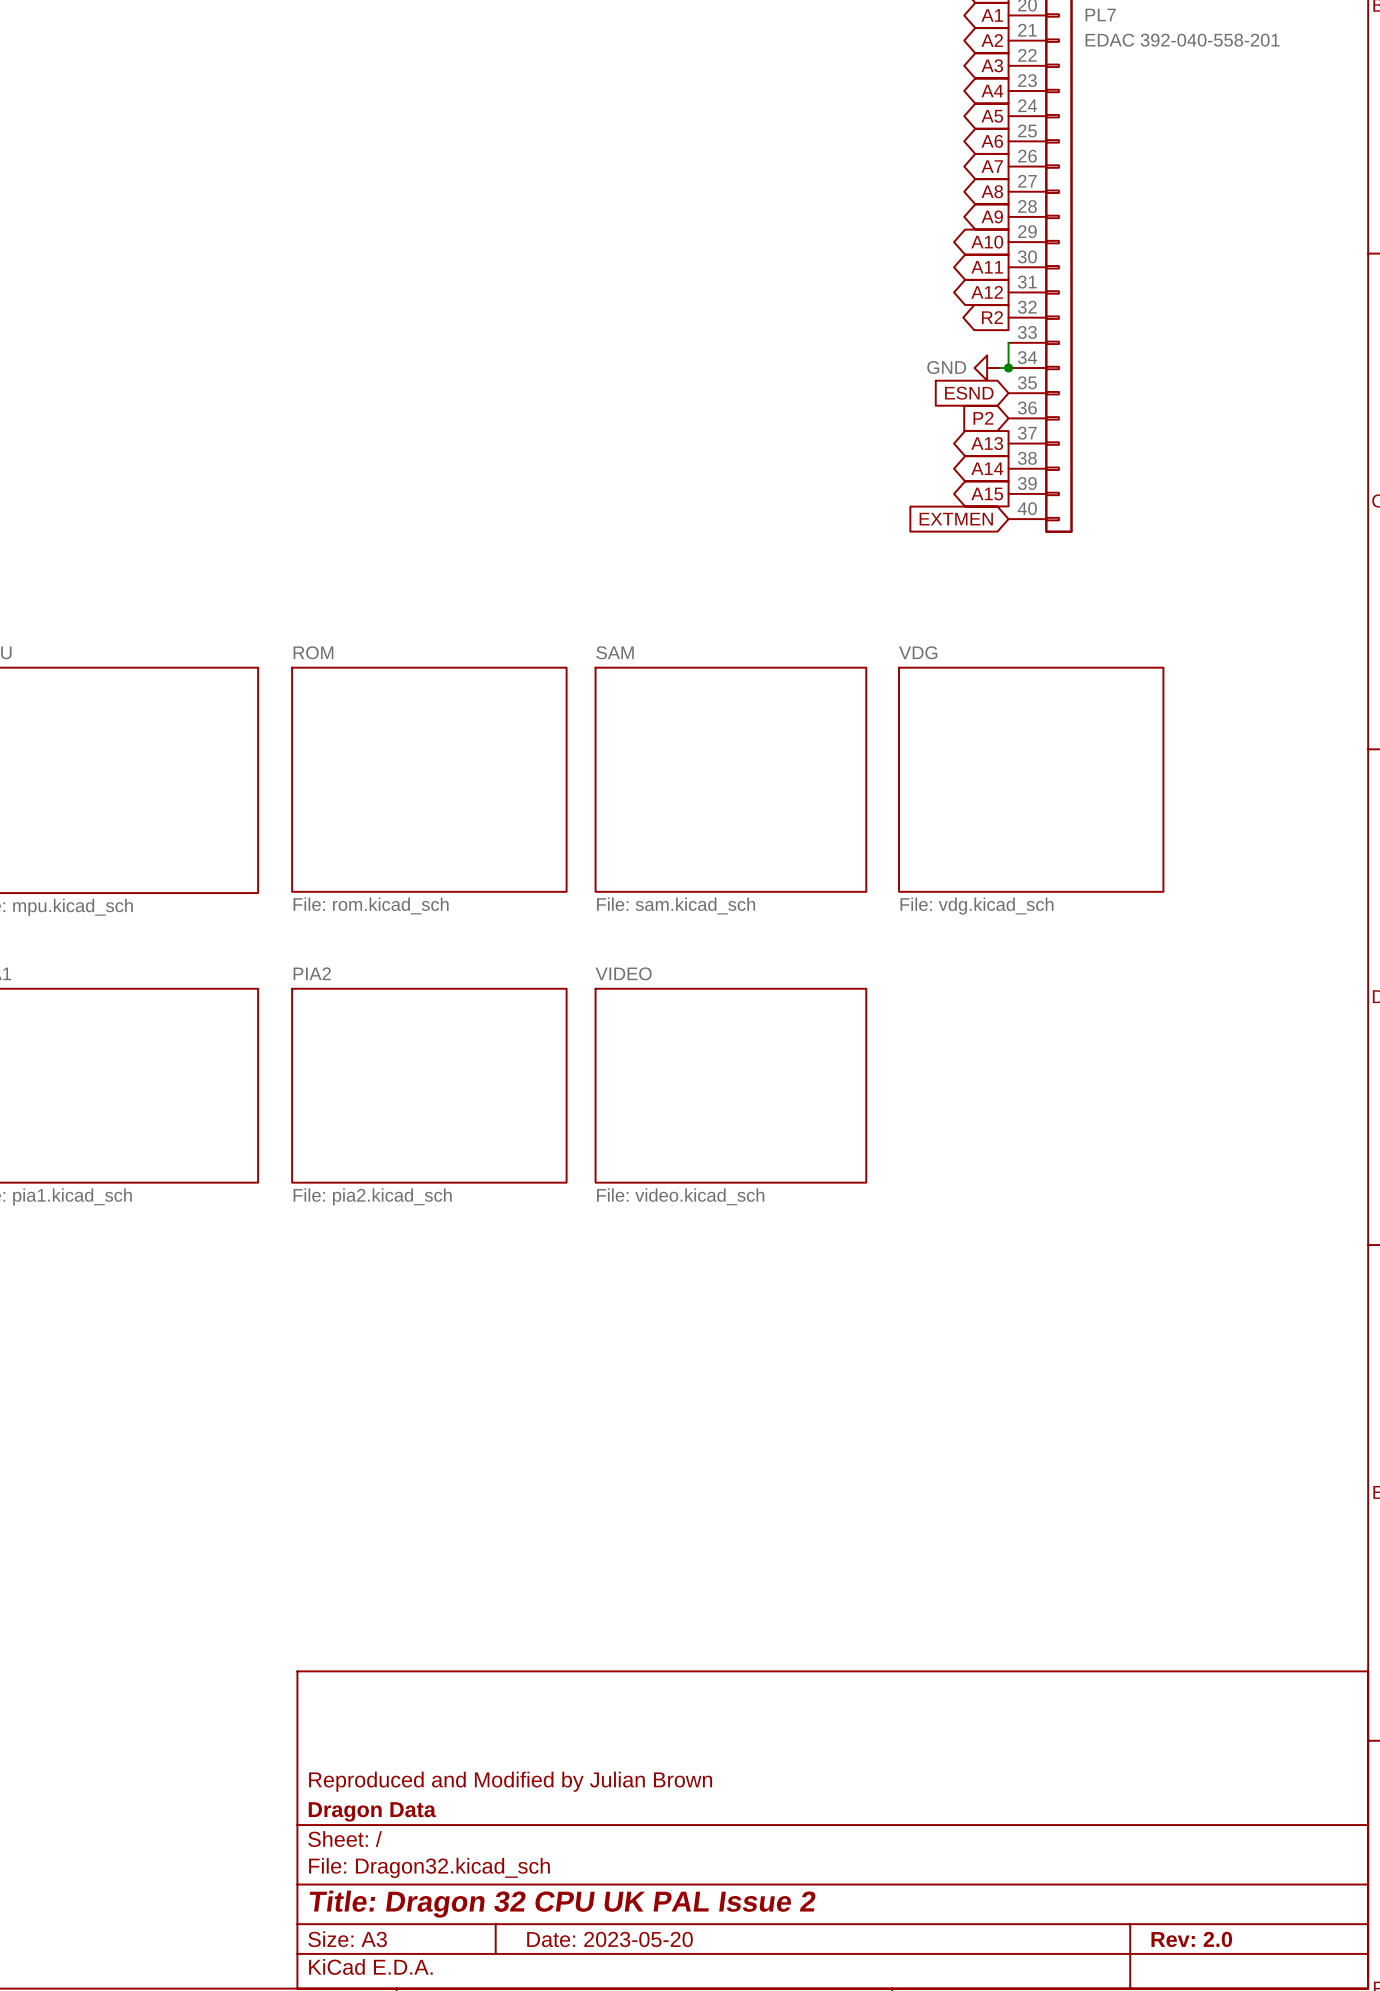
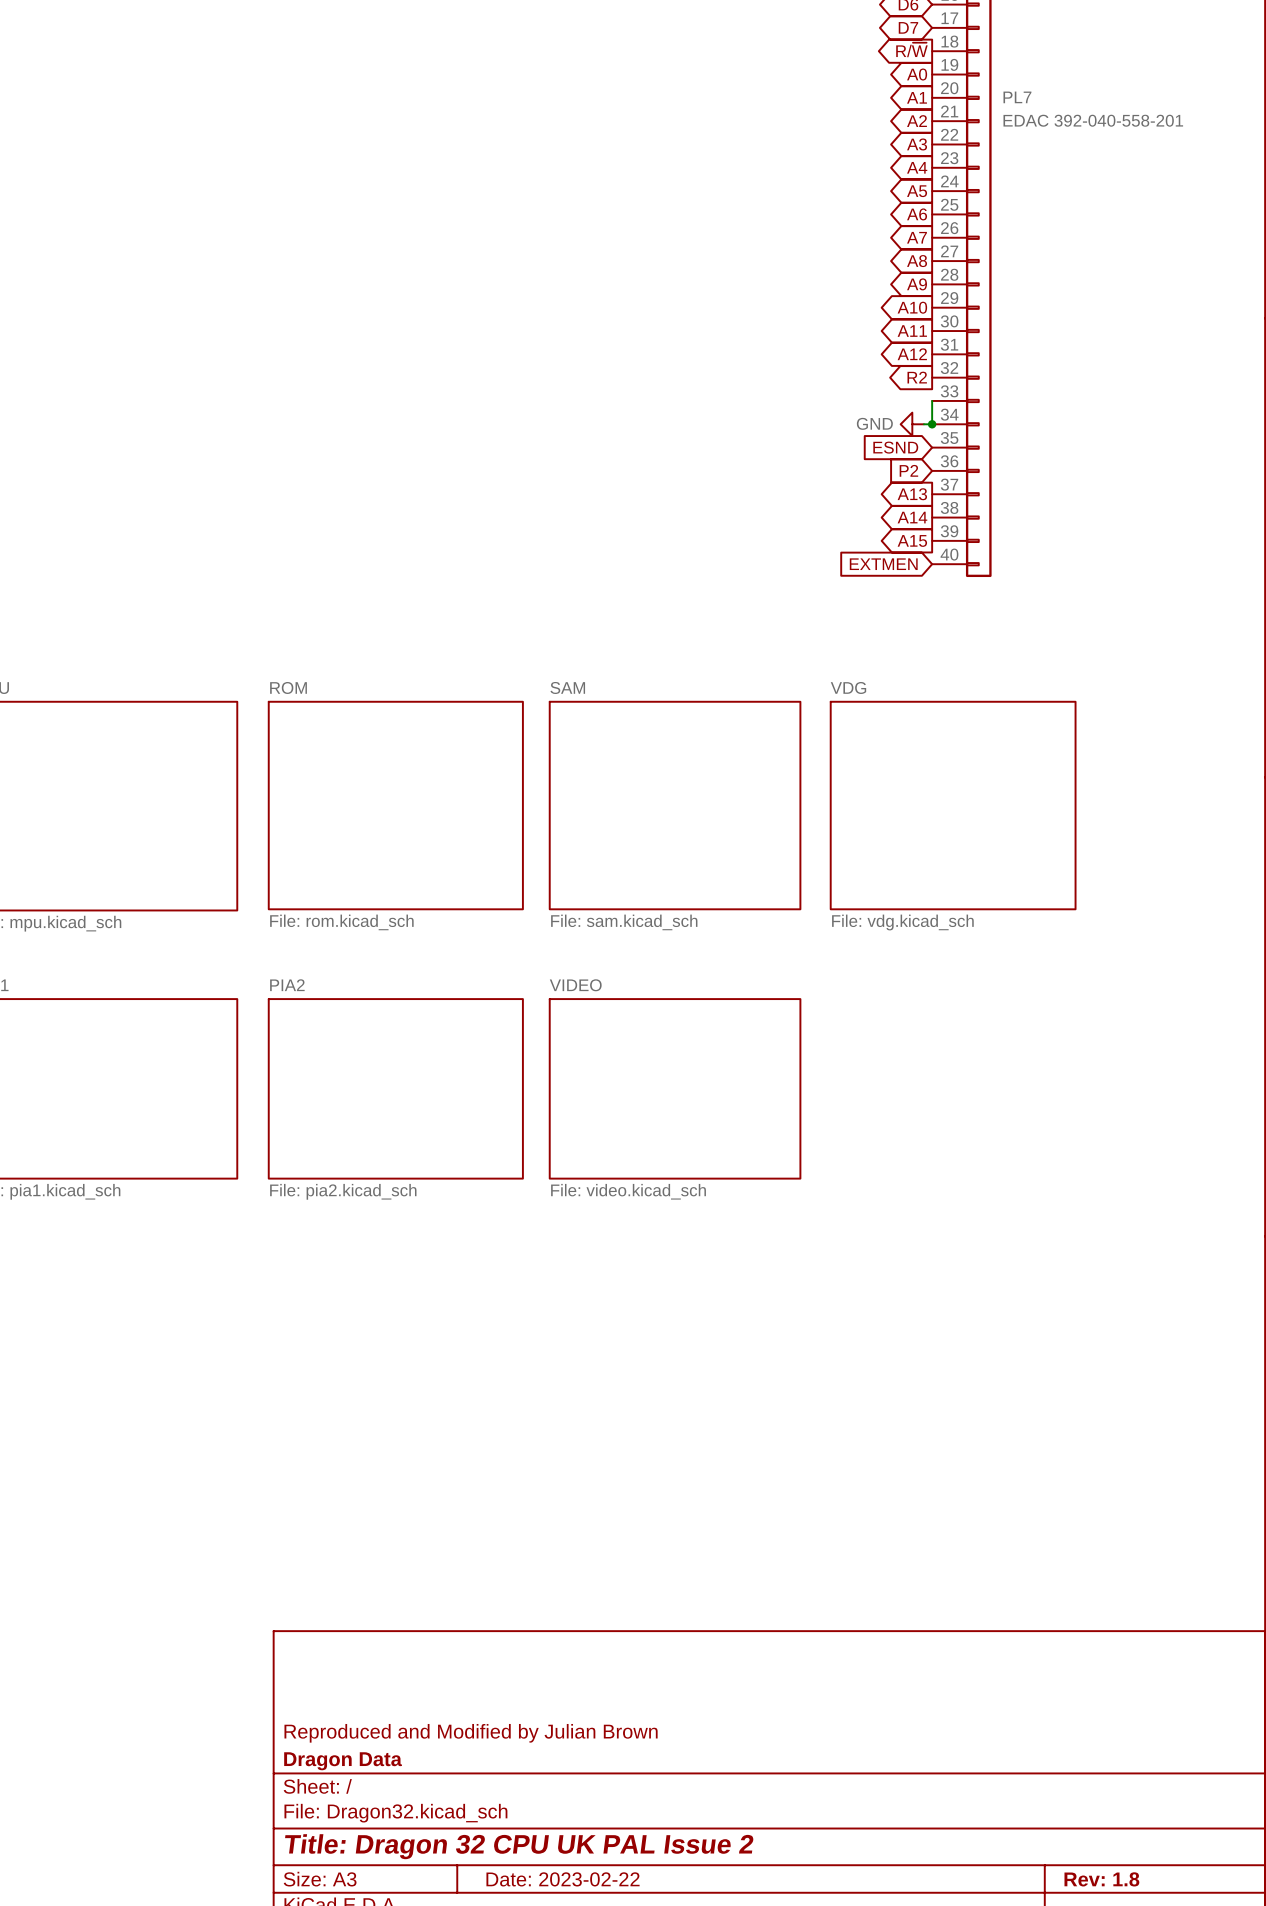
title block: Date: 2023-05-20 (610, 1939) -> Date: 2023-02-22 (563, 1879)
title block: Rev: 2.0 (1191, 1939) -> Rev: 1.8 (1101, 1879)

